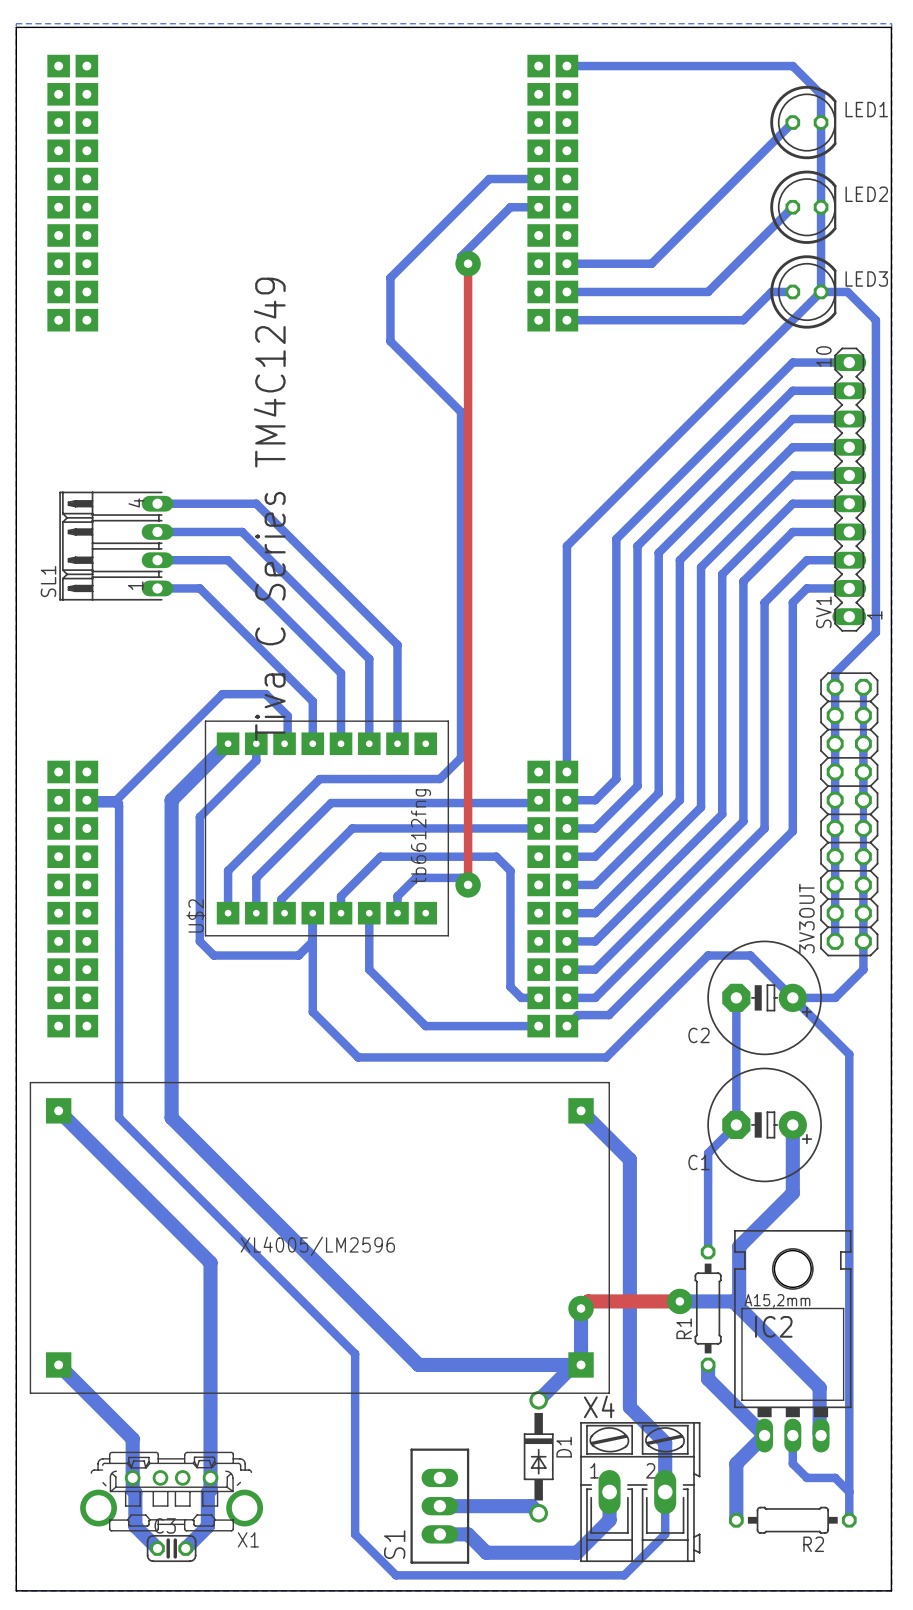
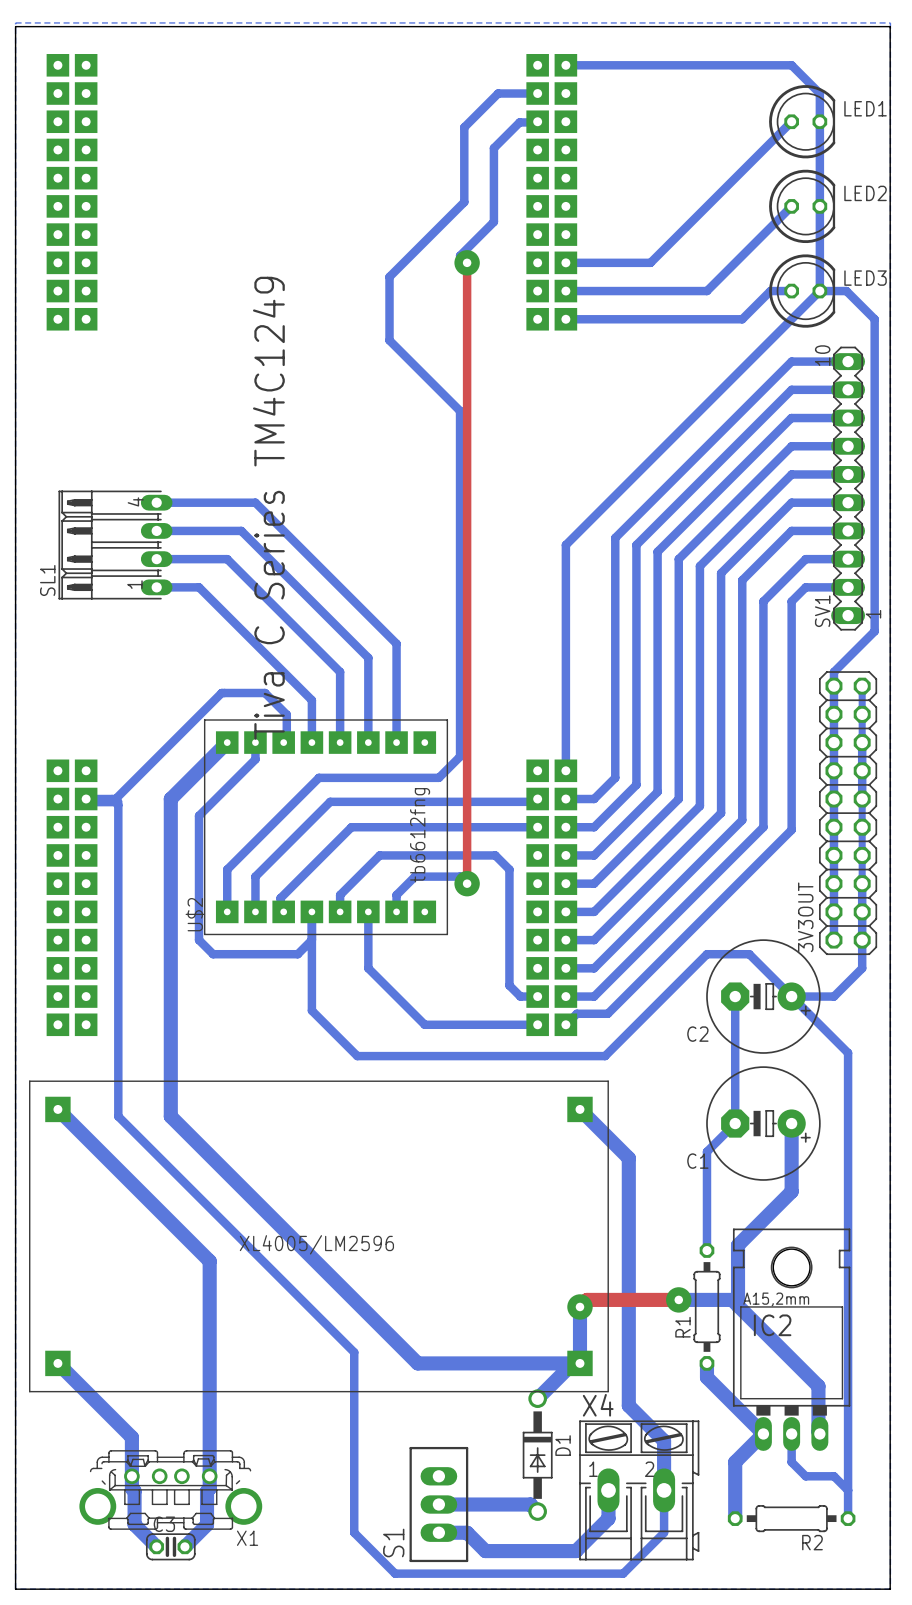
bottom track: (538, 179) (489, 179) (465, 203) -> (537, 93) (498, 93) (464, 127) (464, 202)
bottom track: (538, 207) (510, 207) (494, 222) -> (537, 121) (519, 122) (493, 148) (493, 221)

